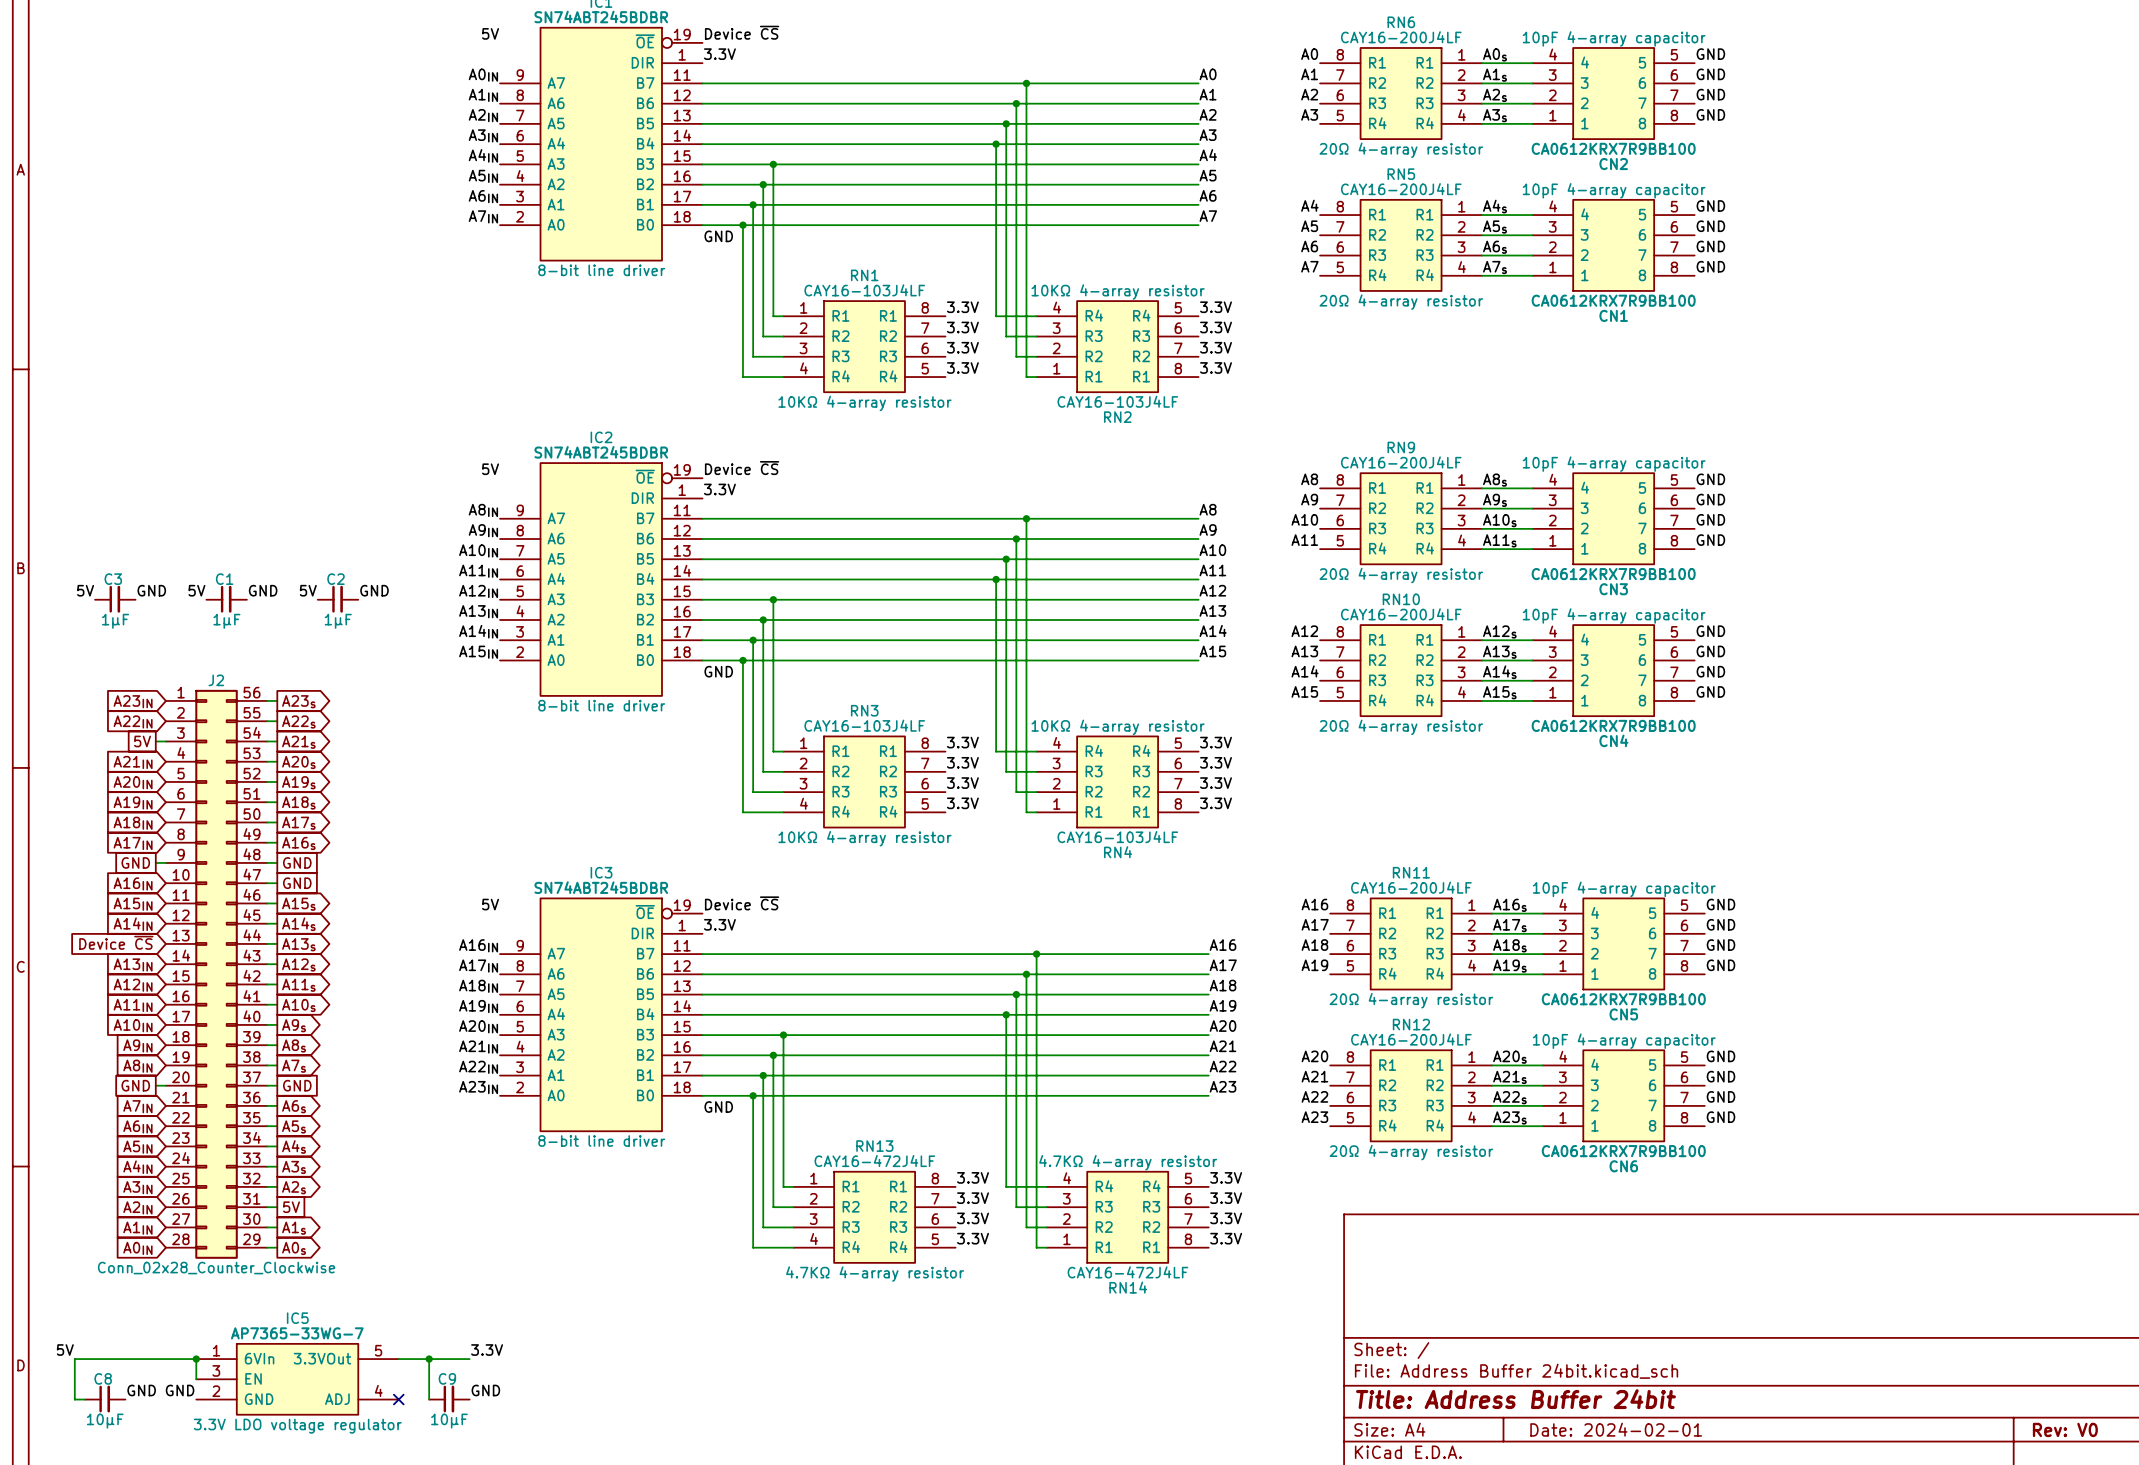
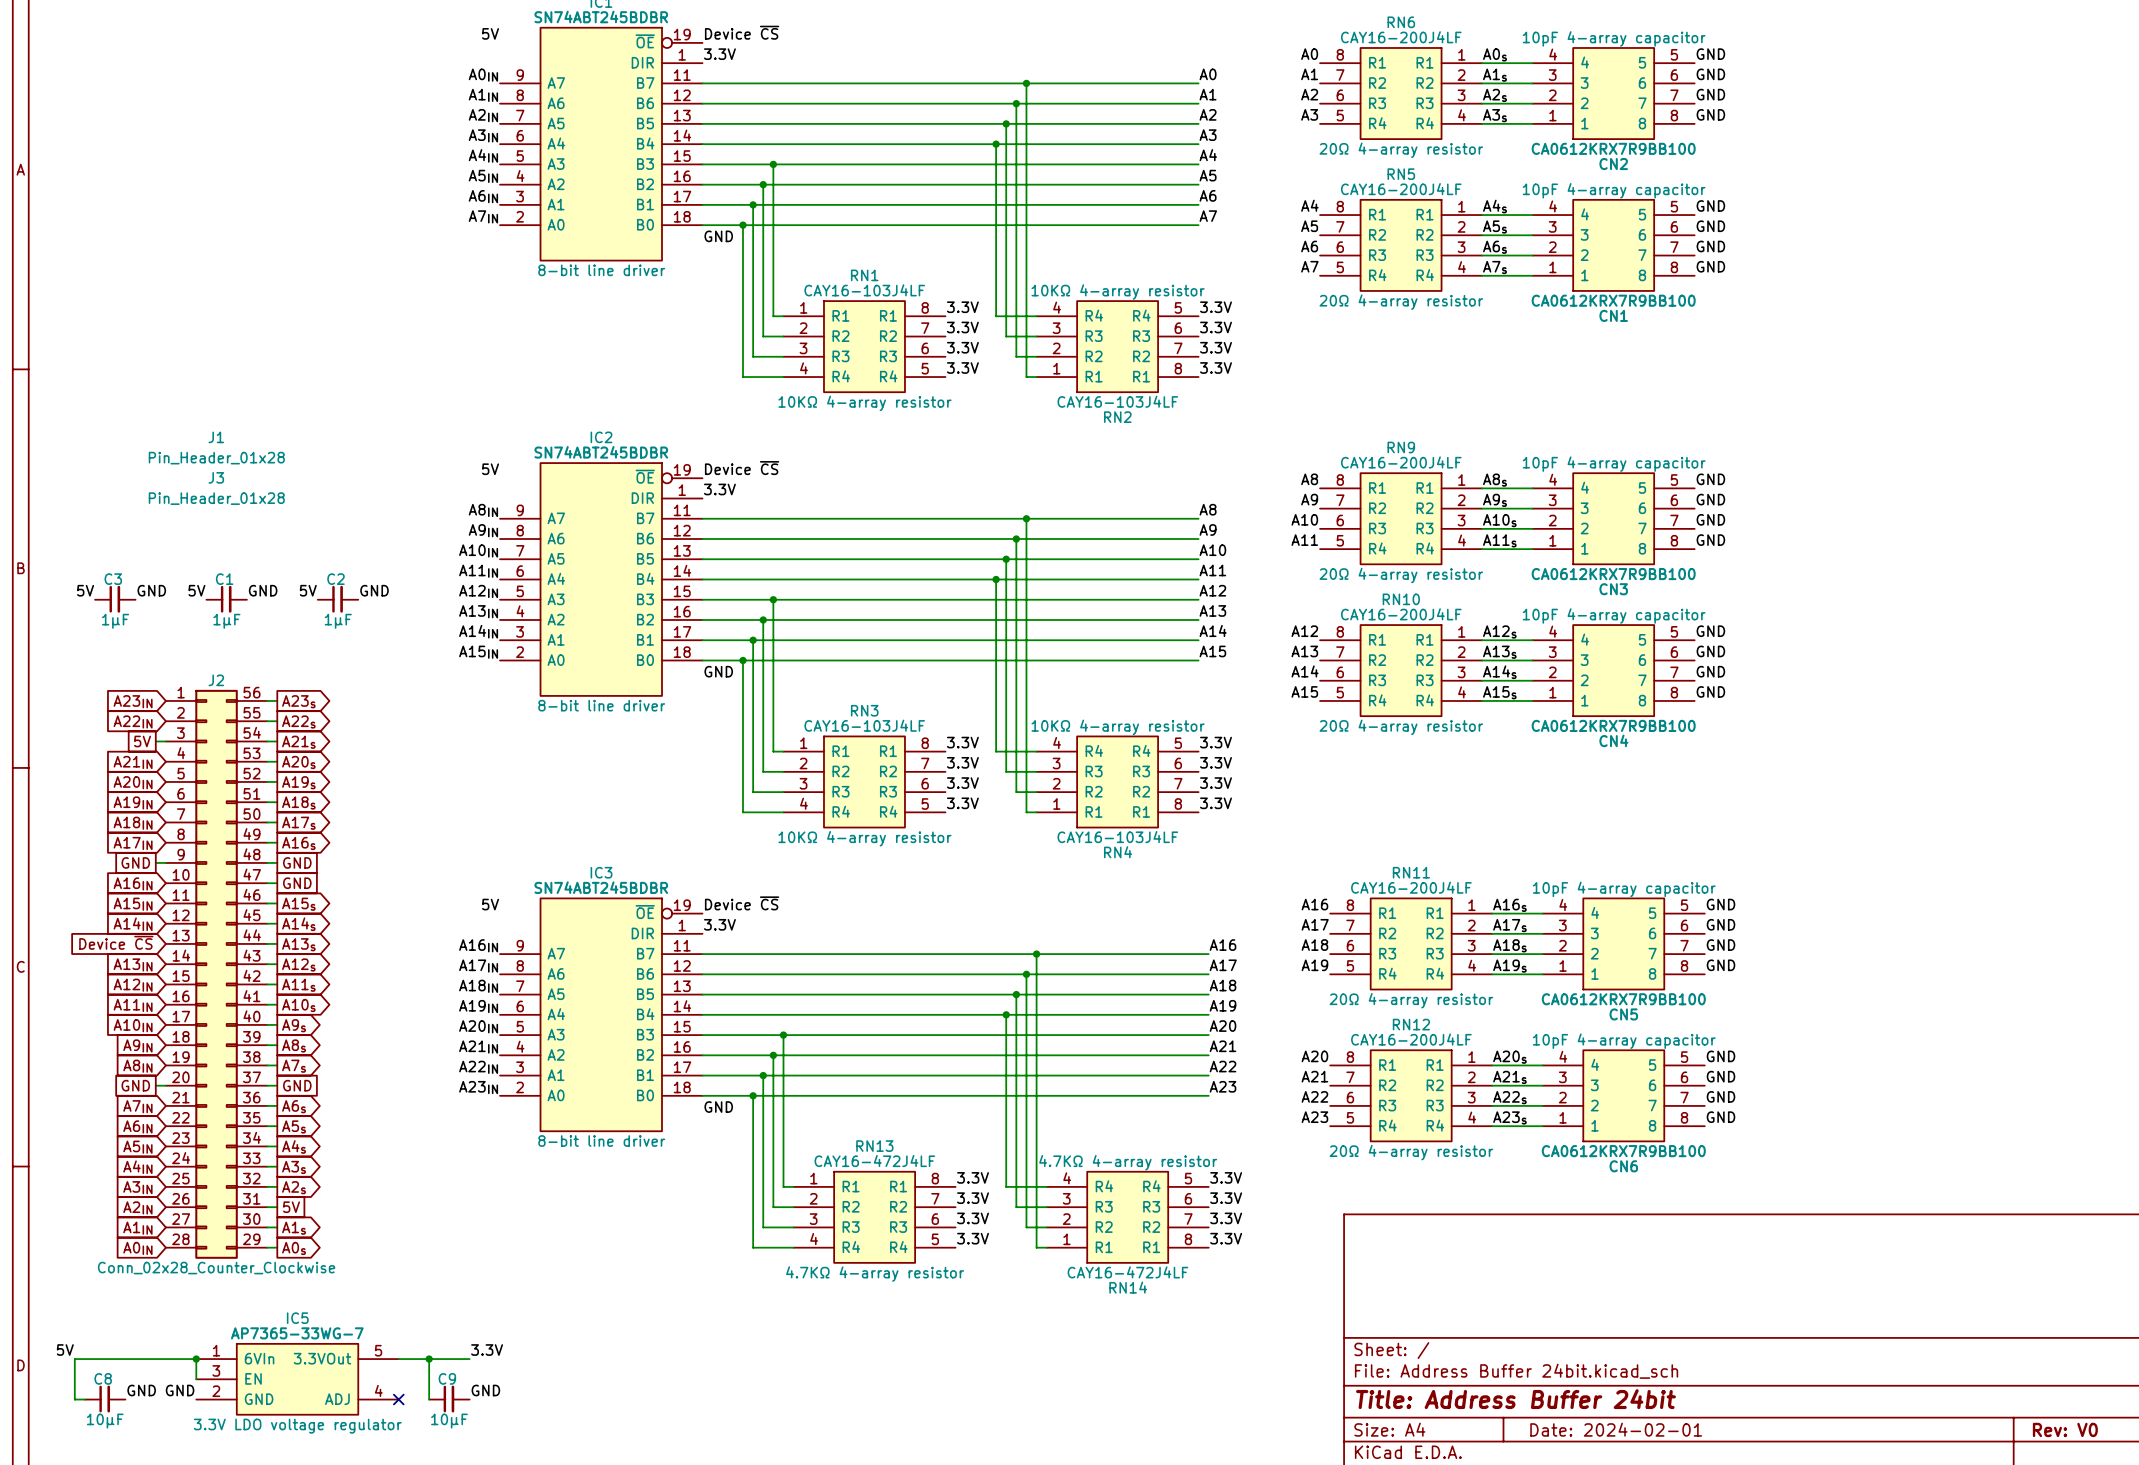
J1: none -> Pin_Header_01x28 (216, 447)
J3: none -> Pin_Header_01x28 (216, 488)

